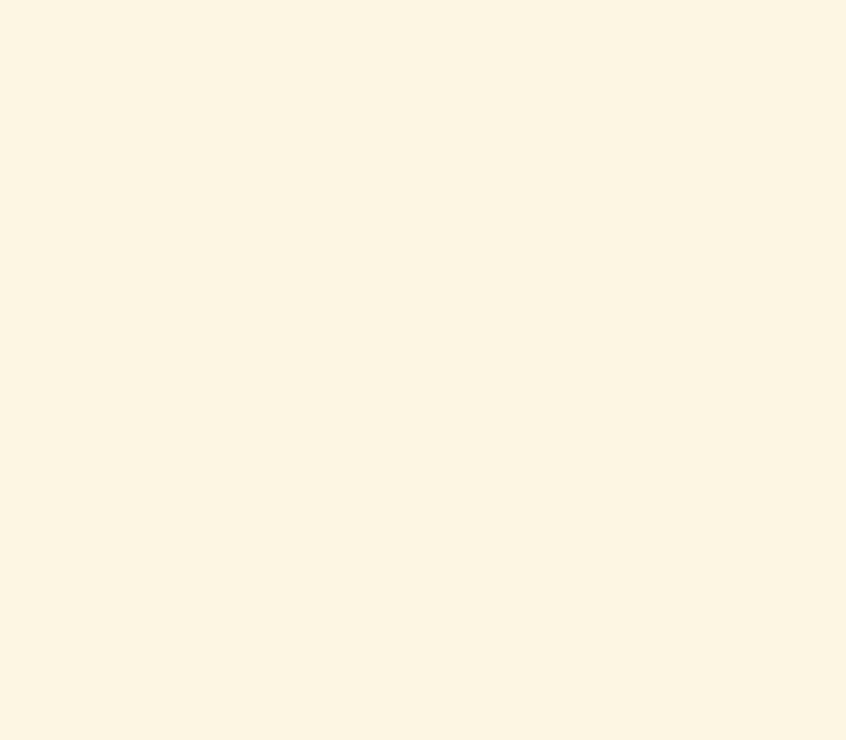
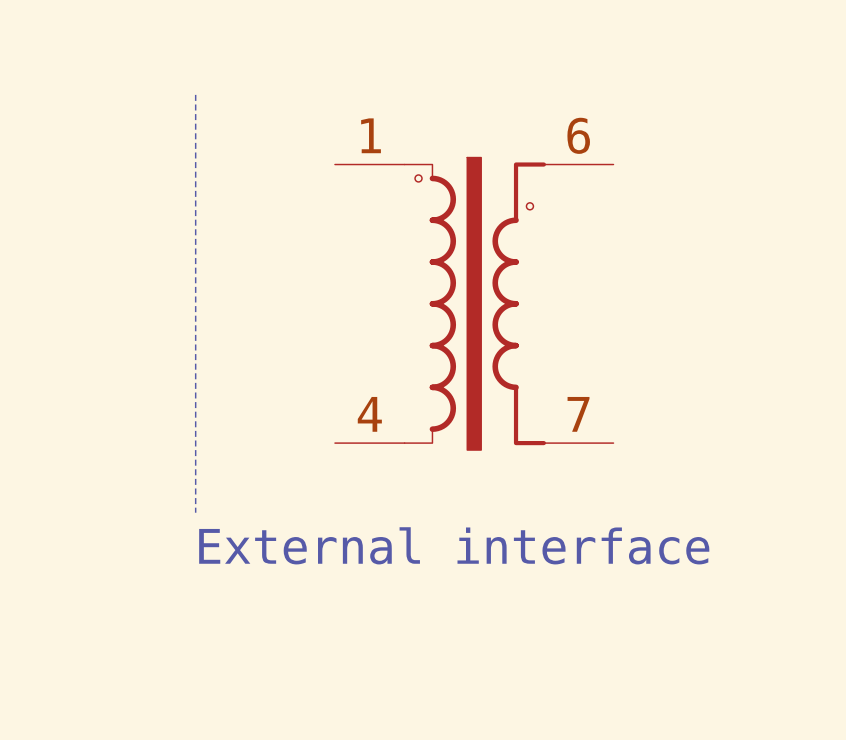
line: none -> (195, 94) (195, 512)
part: none -> (474, 303)
text: none -> External interface (454, 545)

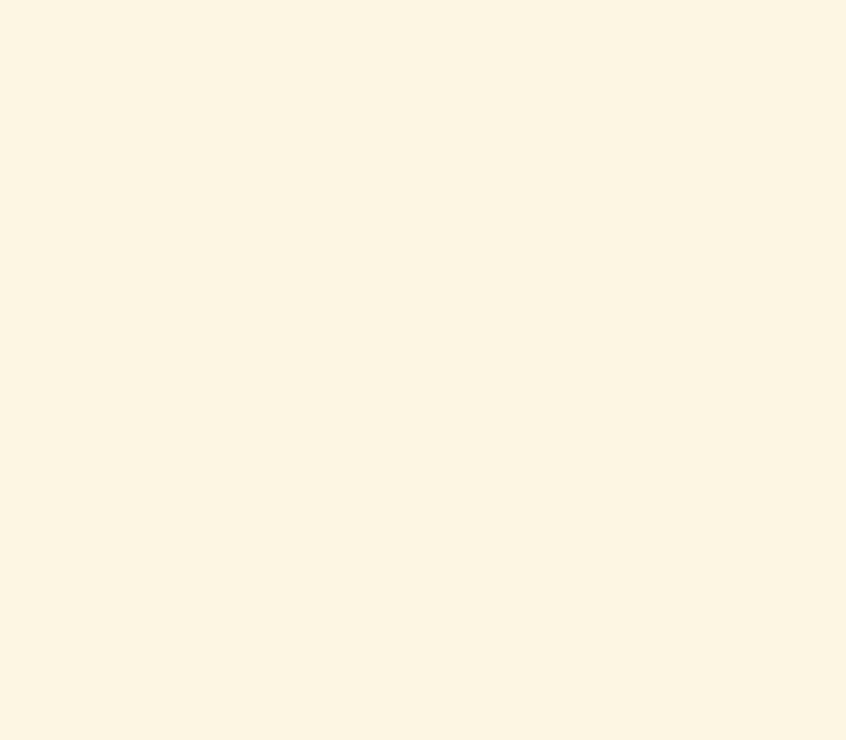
line: (195, 94) (195, 512) -> none
part: (474, 303) -> none
text: External interface (454, 545) -> none

